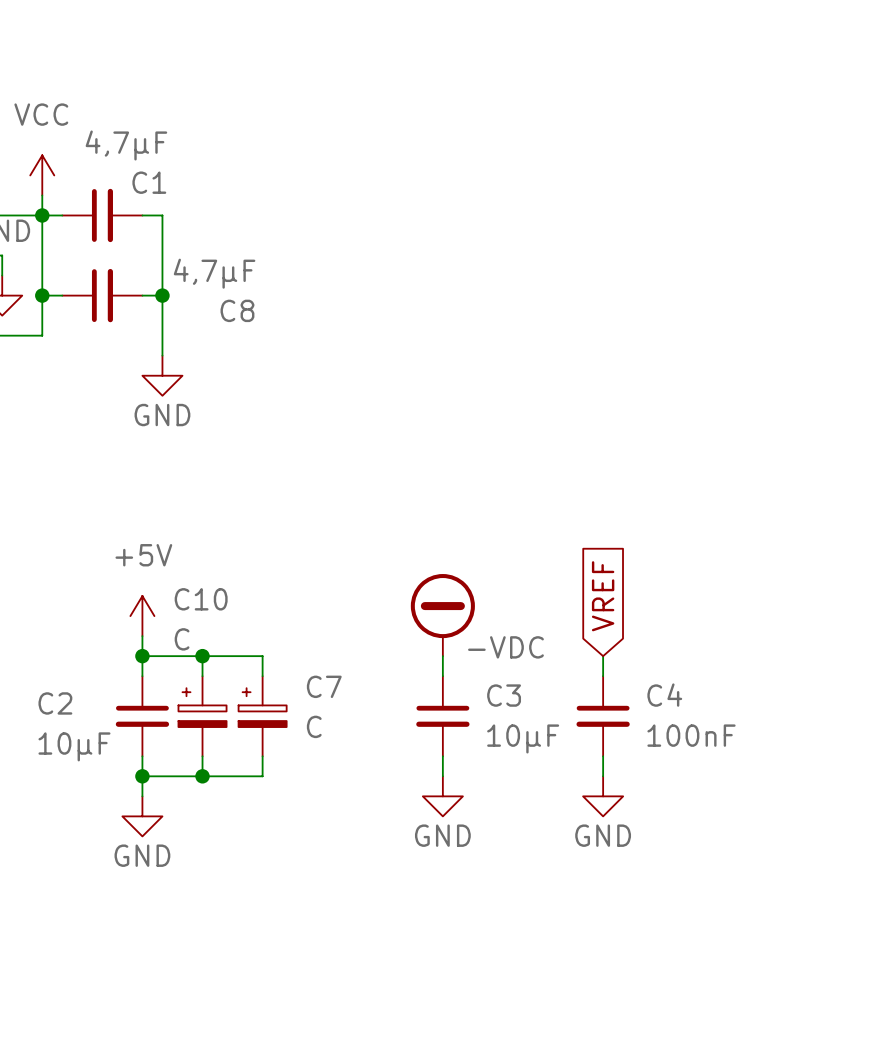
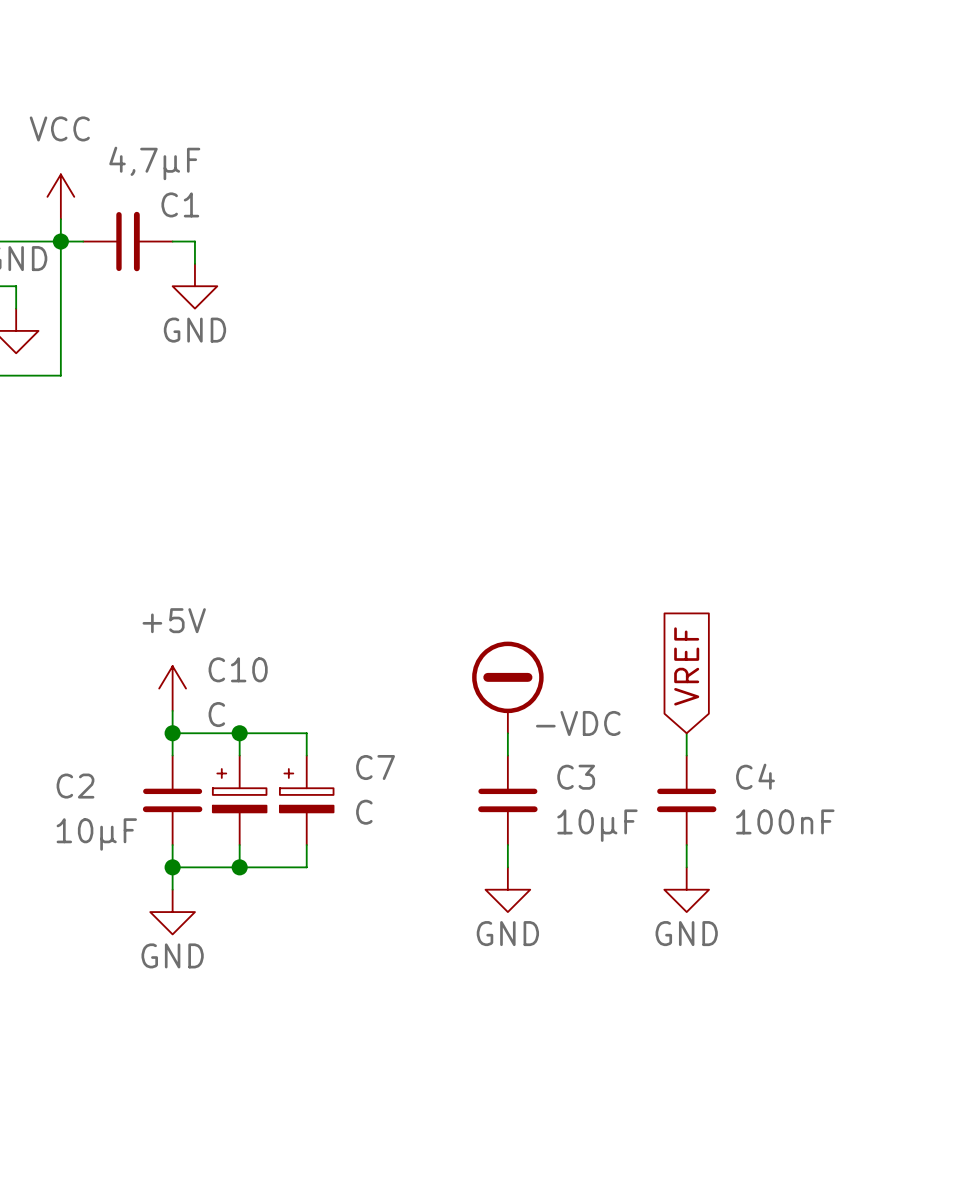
wire: (162, 235) (162, 355) -> none
wire: (42, 295) (62, 295) -> none
junction: (42, 295) -> none
C8: 4,7µF (102, 295) -> none
wire: (142, 295) (162, 295) -> none
junction: (162, 295) -> none
power symbol position: GND (162, 375) -> GND (194, 286)

